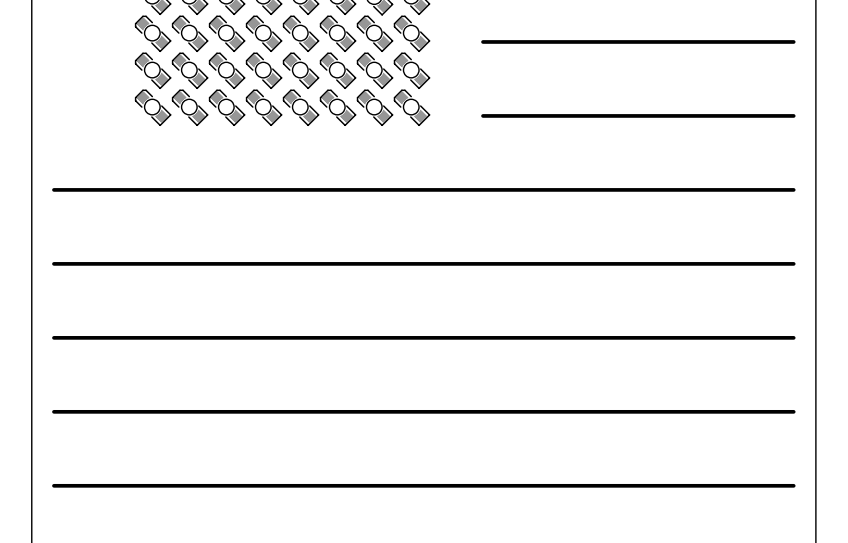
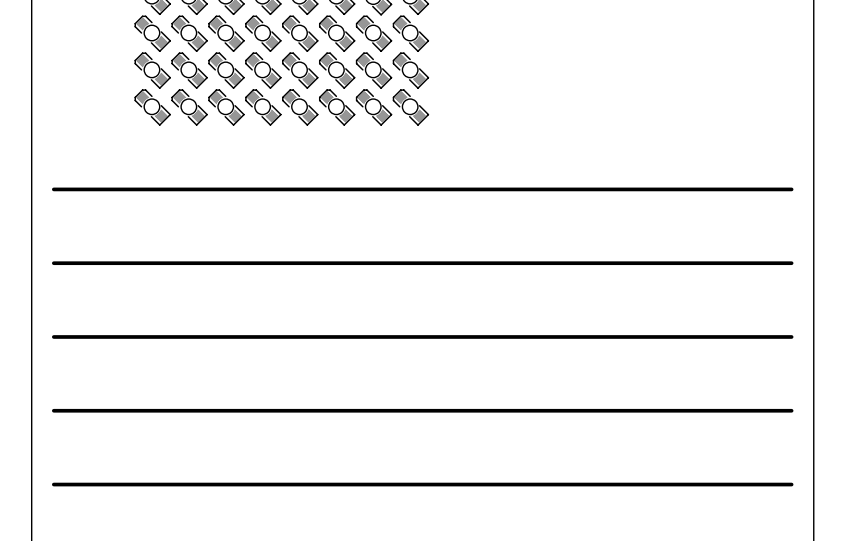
line: (793, 41) (483, 41) -> none
line: (793, 115) (483, 115) -> none

